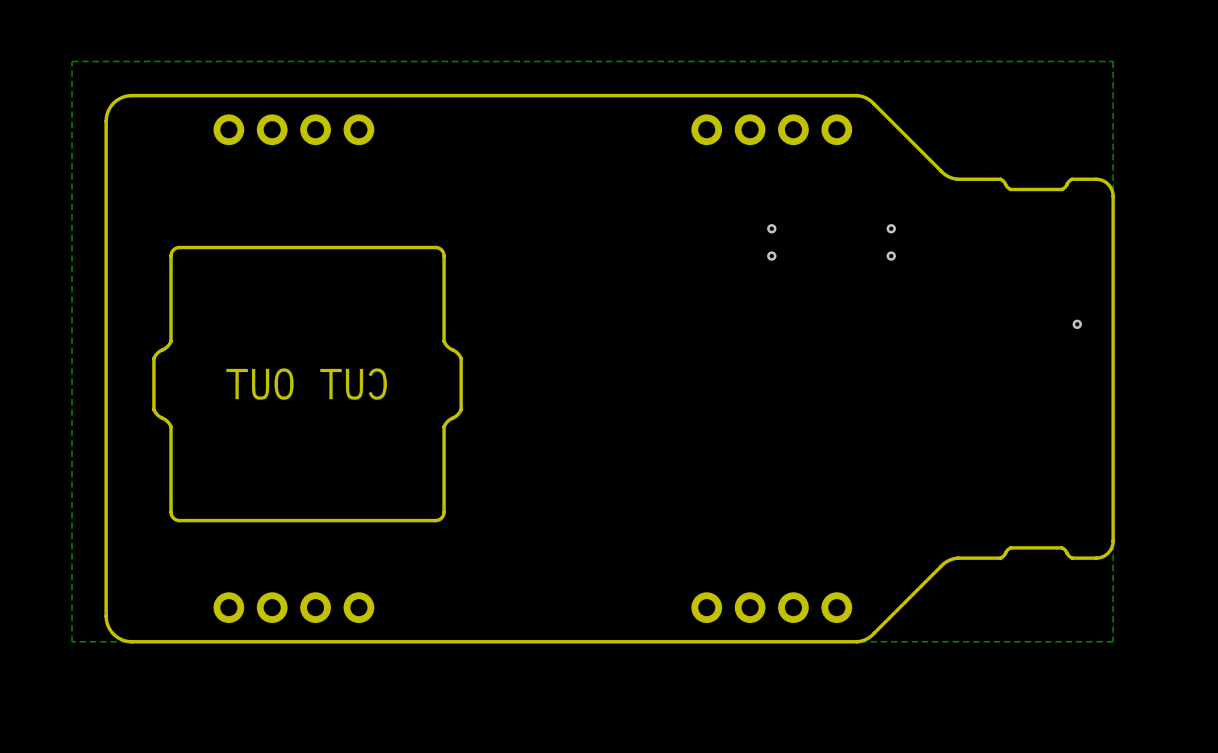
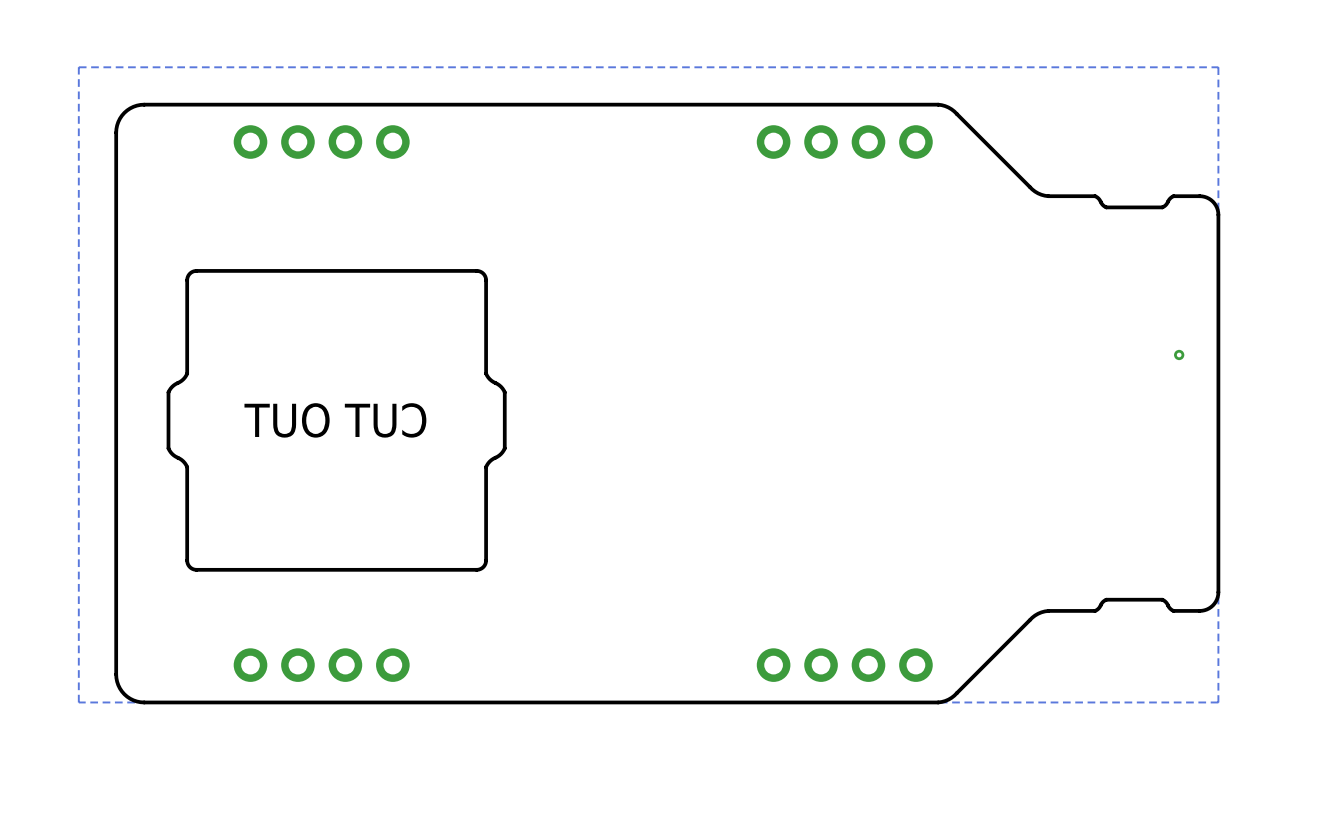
via: (771, 228) -> none
via: (891, 228) -> none
via: (771, 256) -> none
via: (891, 256) -> none

